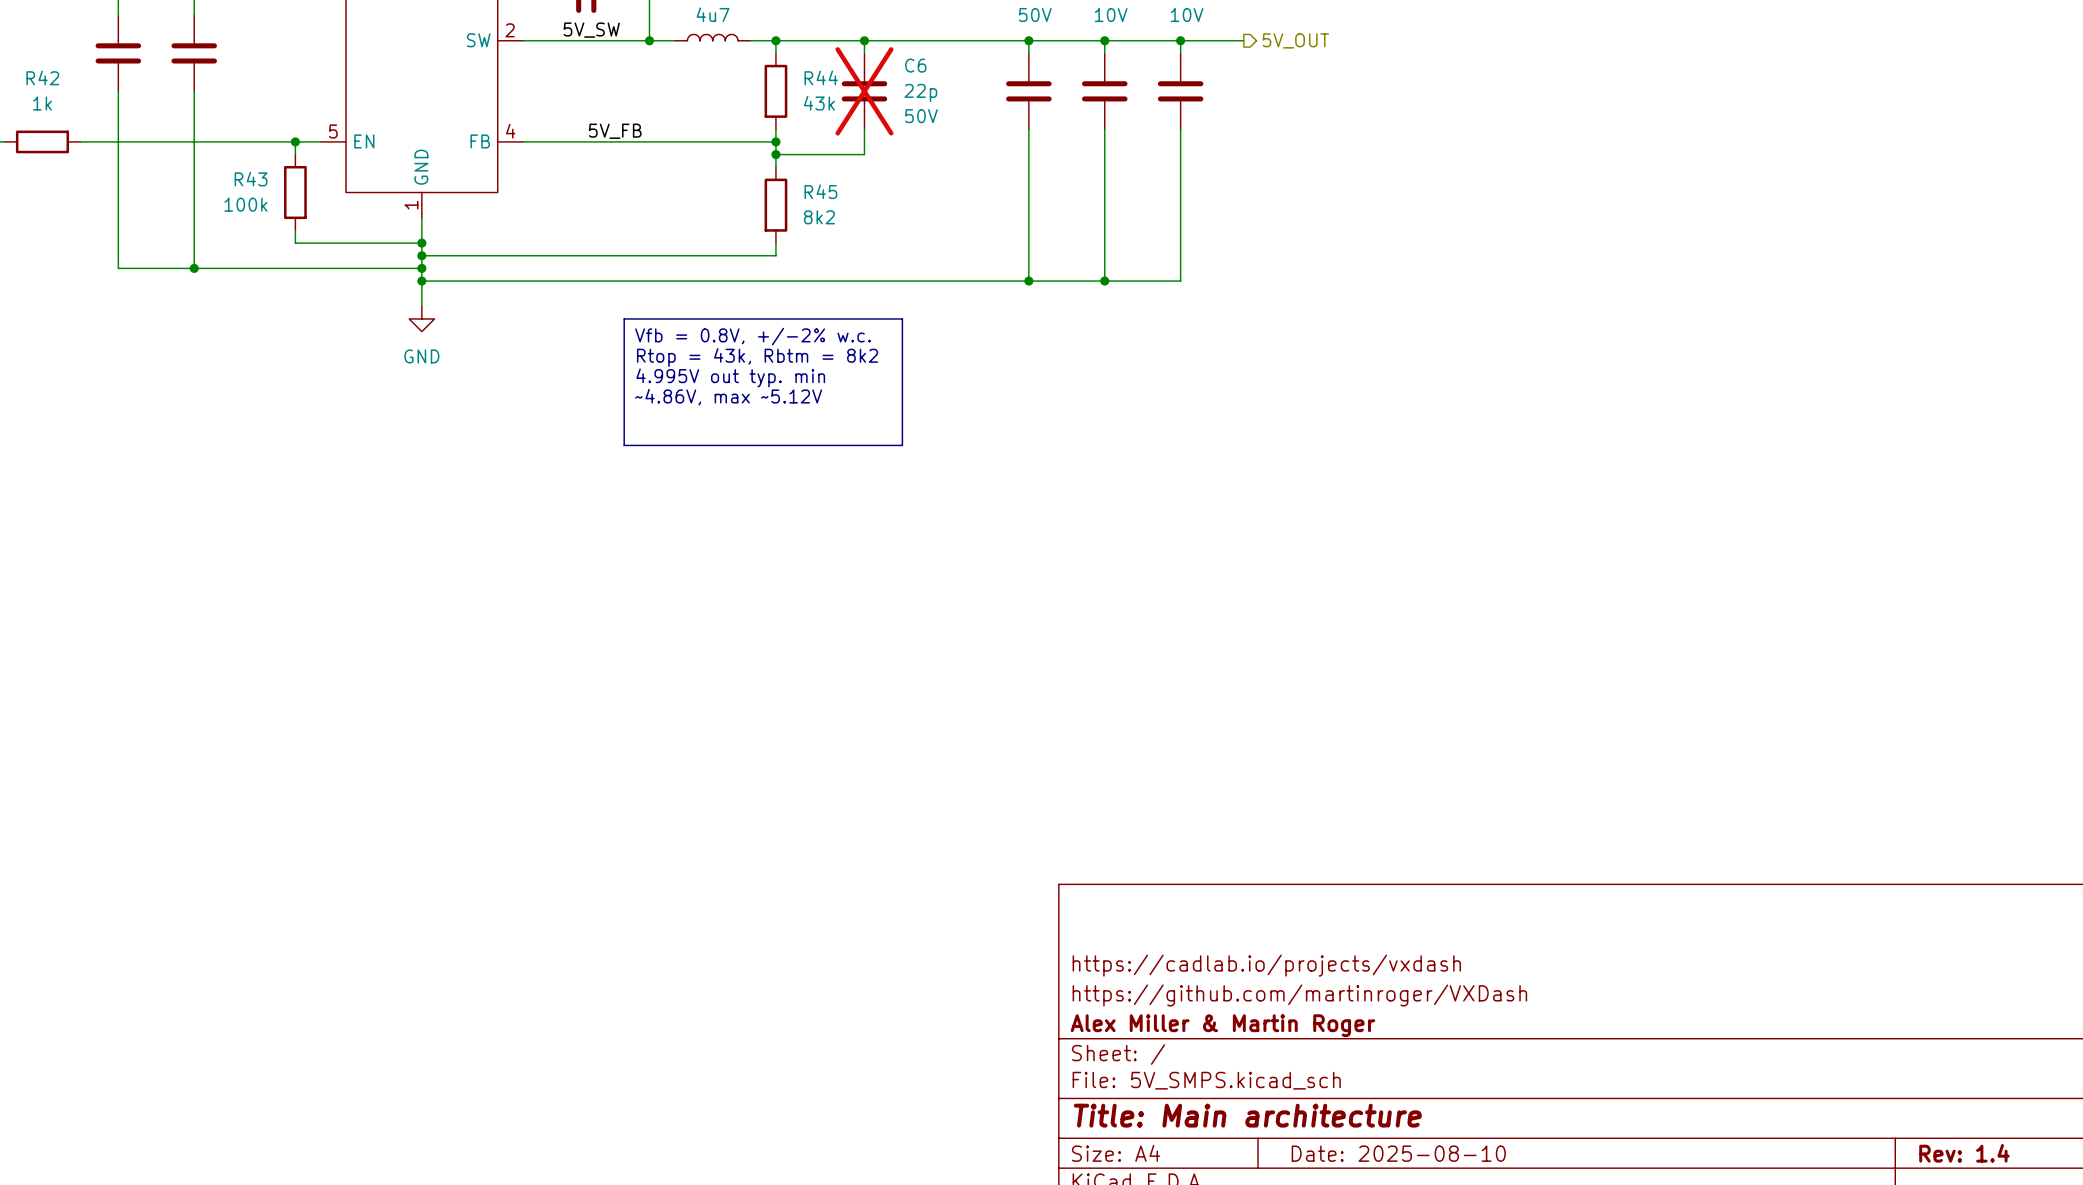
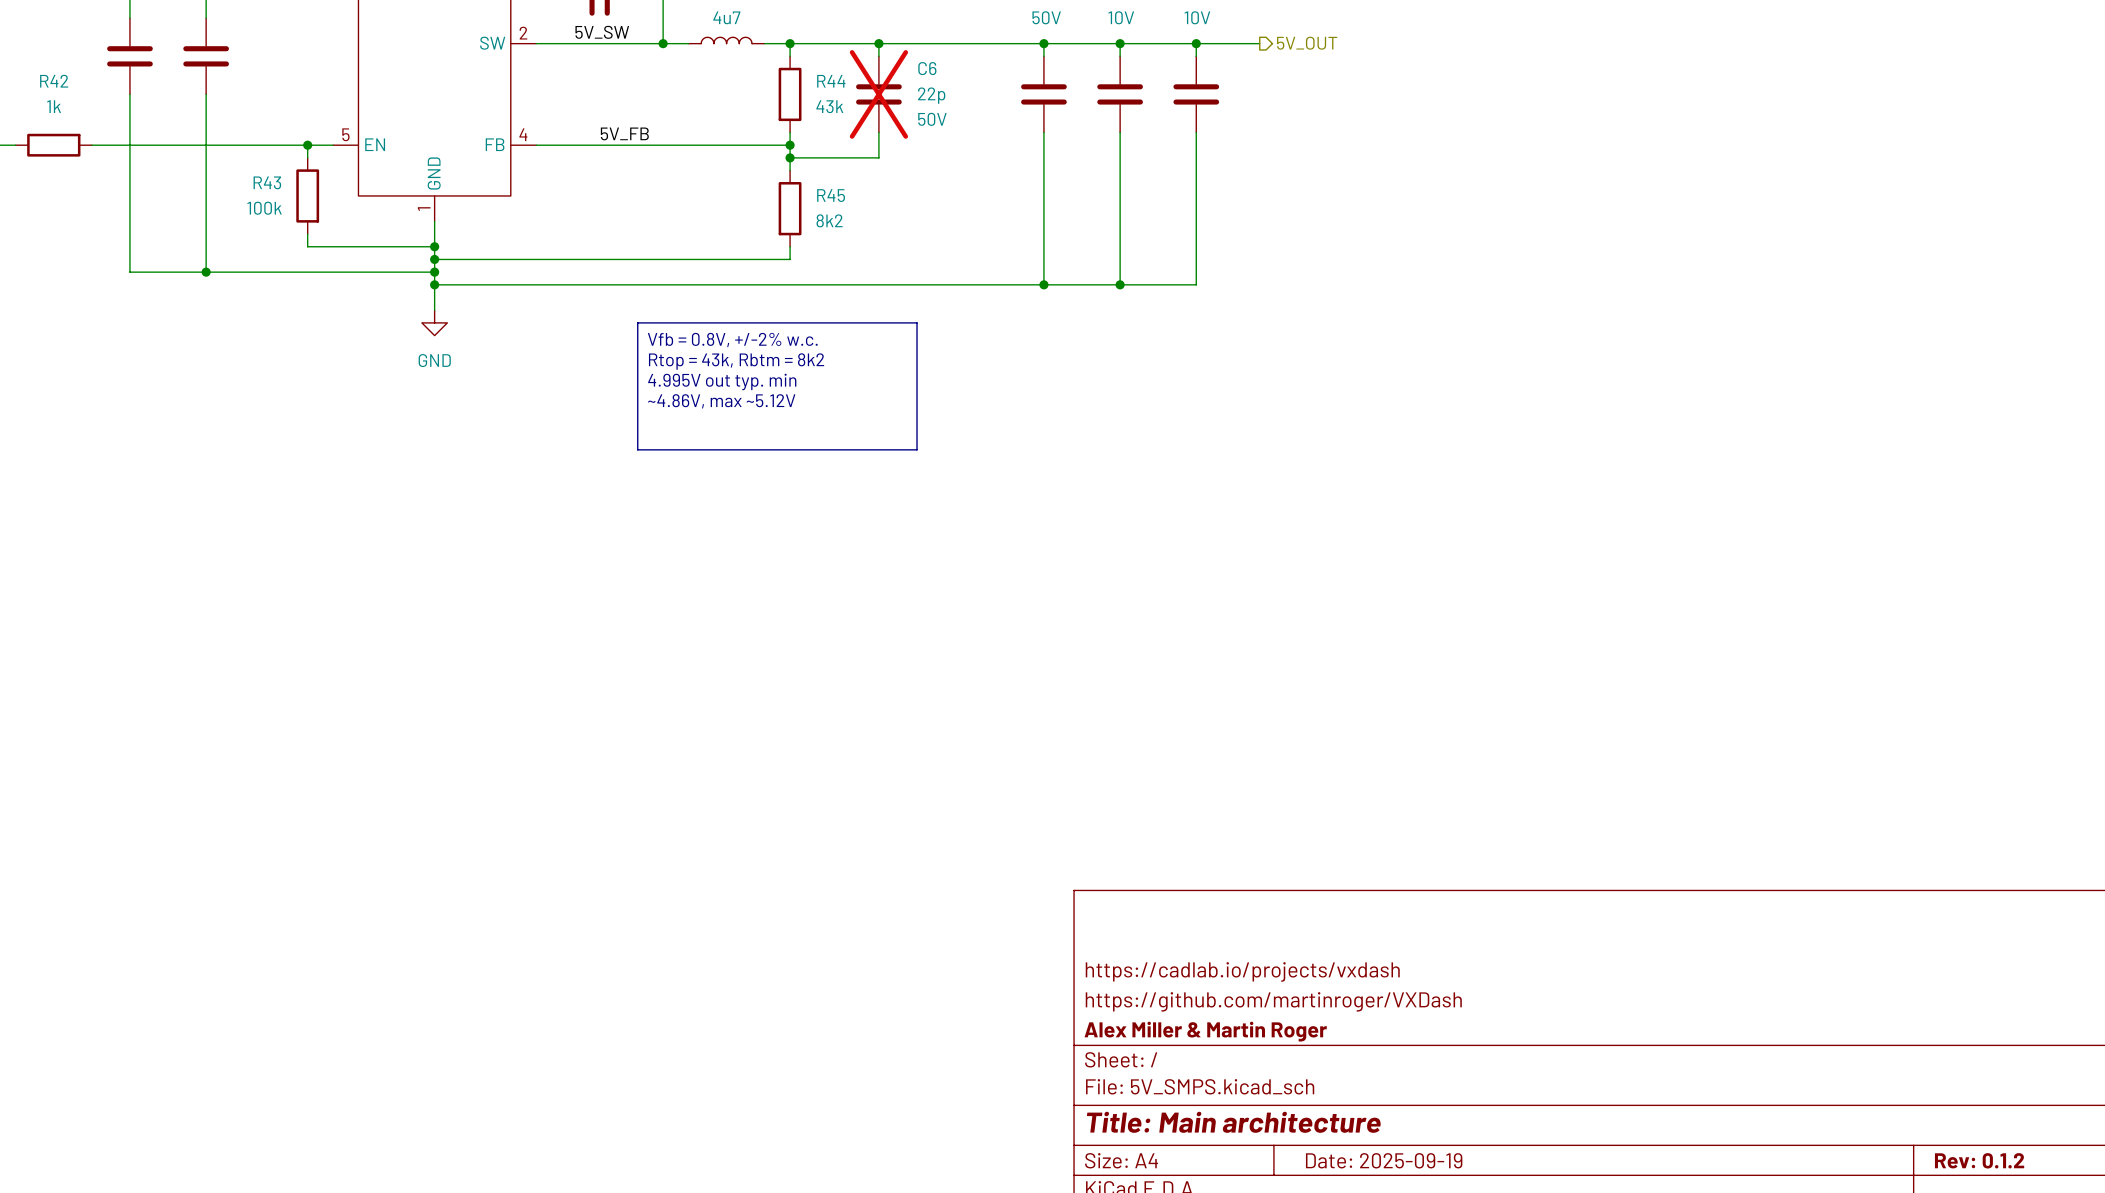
title block: Date: 2025-08-10 (1398, 1153) -> Date: 2025-09-19 (1384, 1160)
title block: Rev: 1.4 (1964, 1153) -> Rev: 0.1.2 (1979, 1160)

